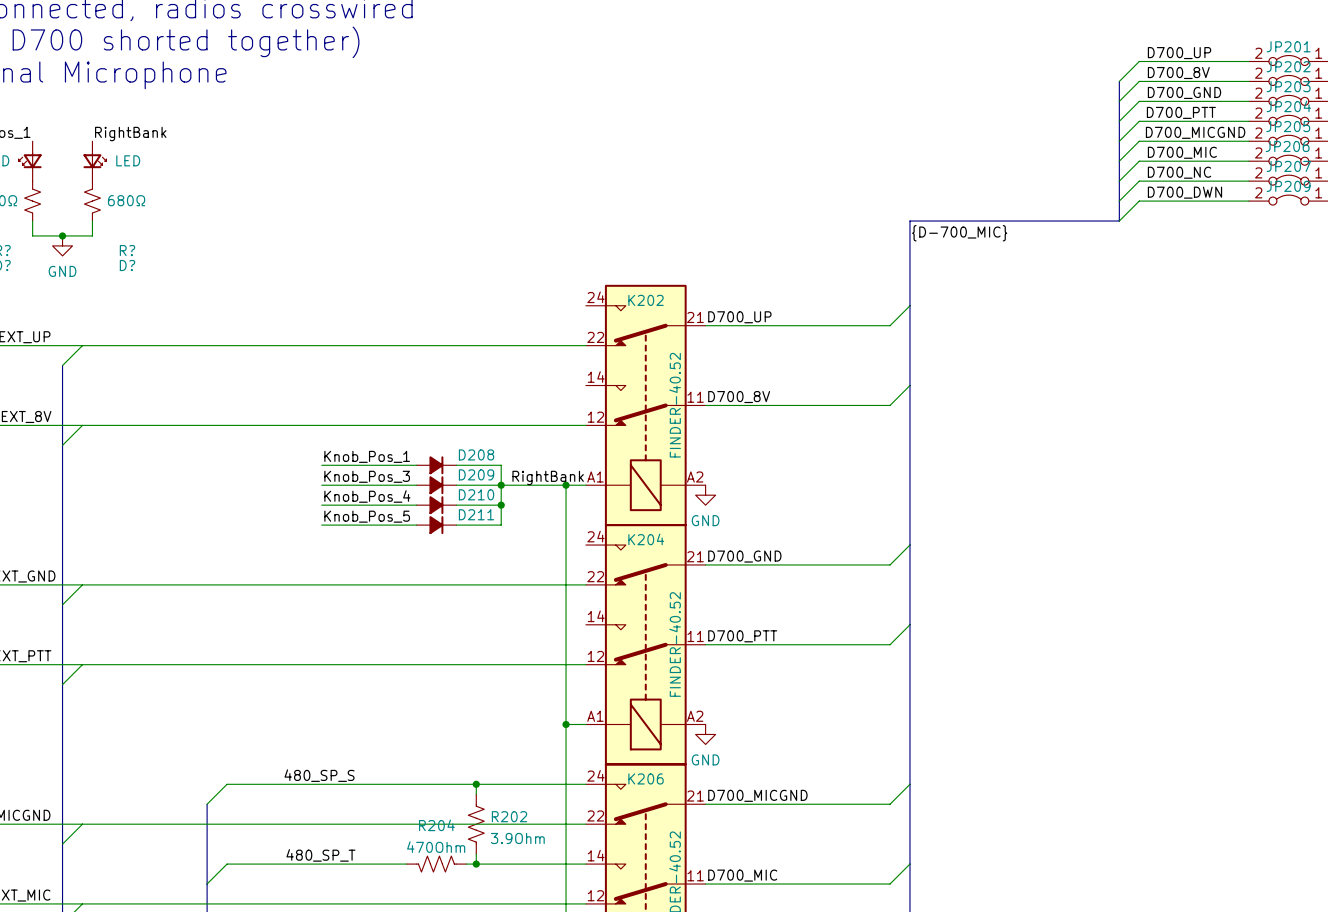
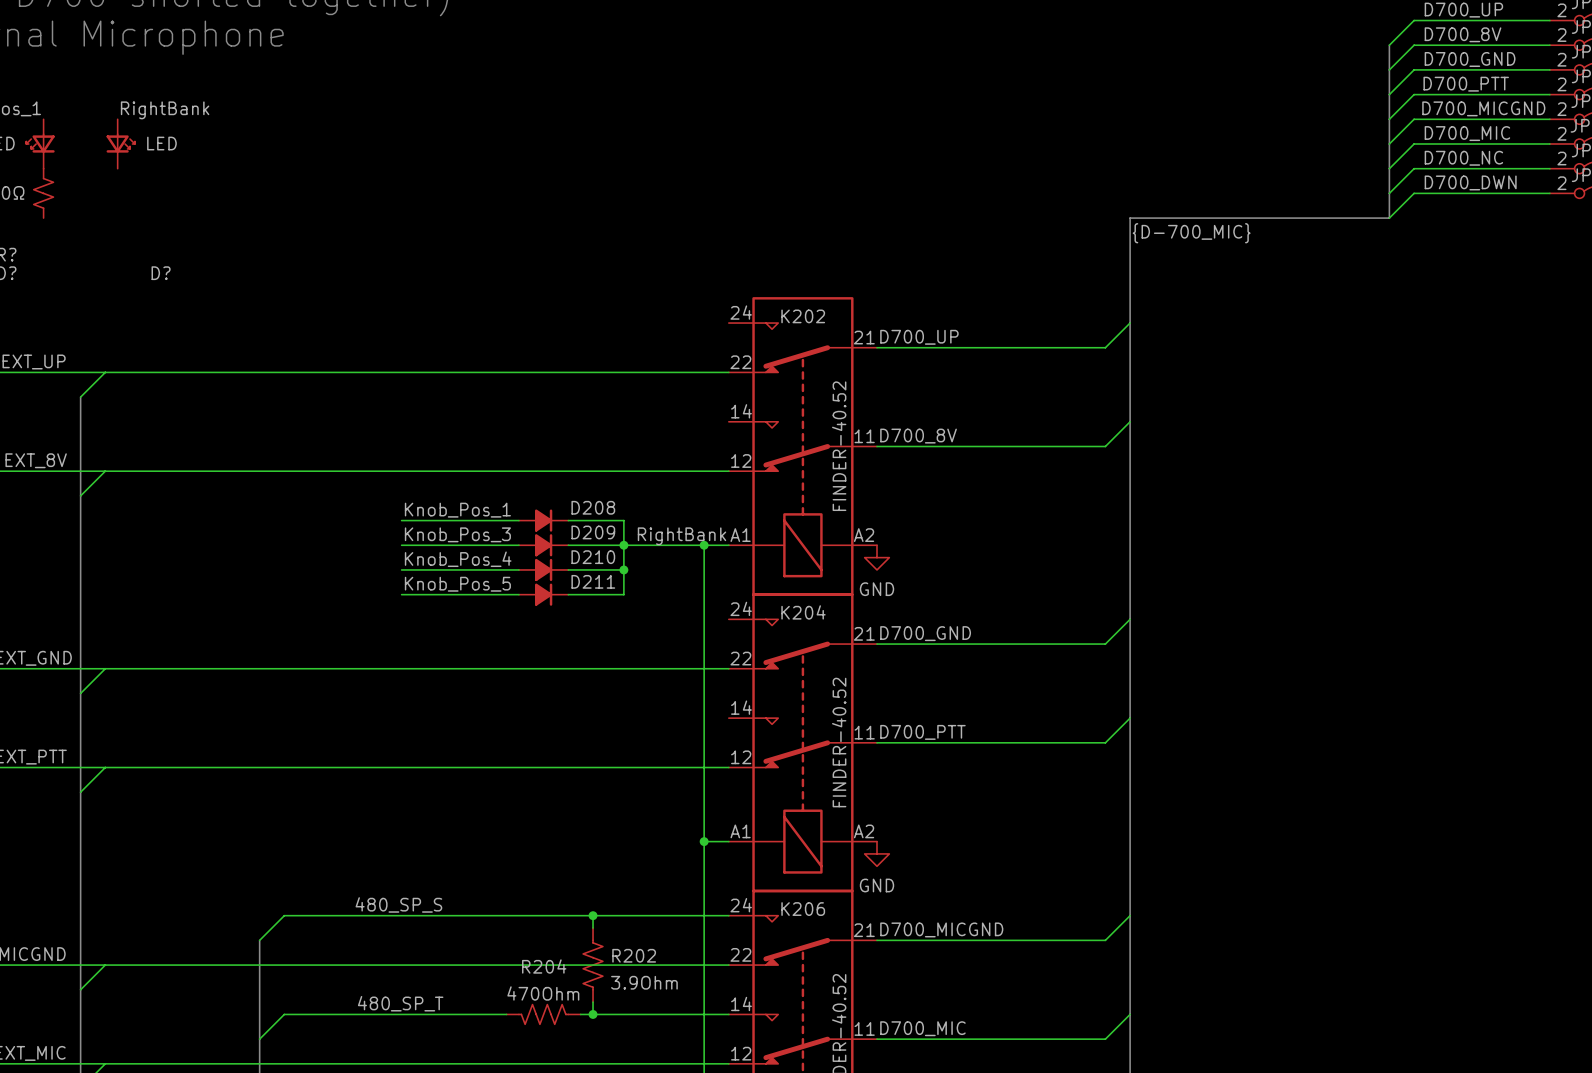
R?: 680Ω (92, 201) -> none
wire: (32, 221) (32, 235) (92, 235) (92, 221) -> none
junction: (62, 235) -> none
power symbol: GND (62, 245) -> none

